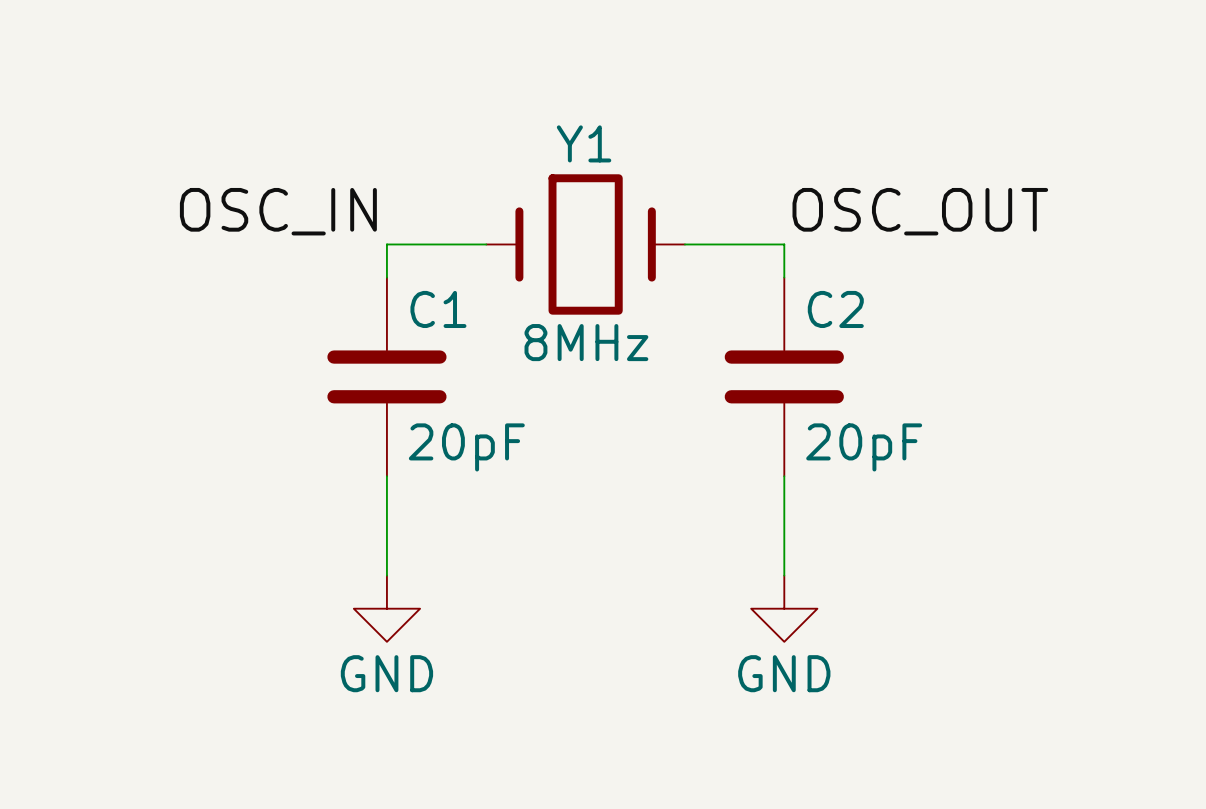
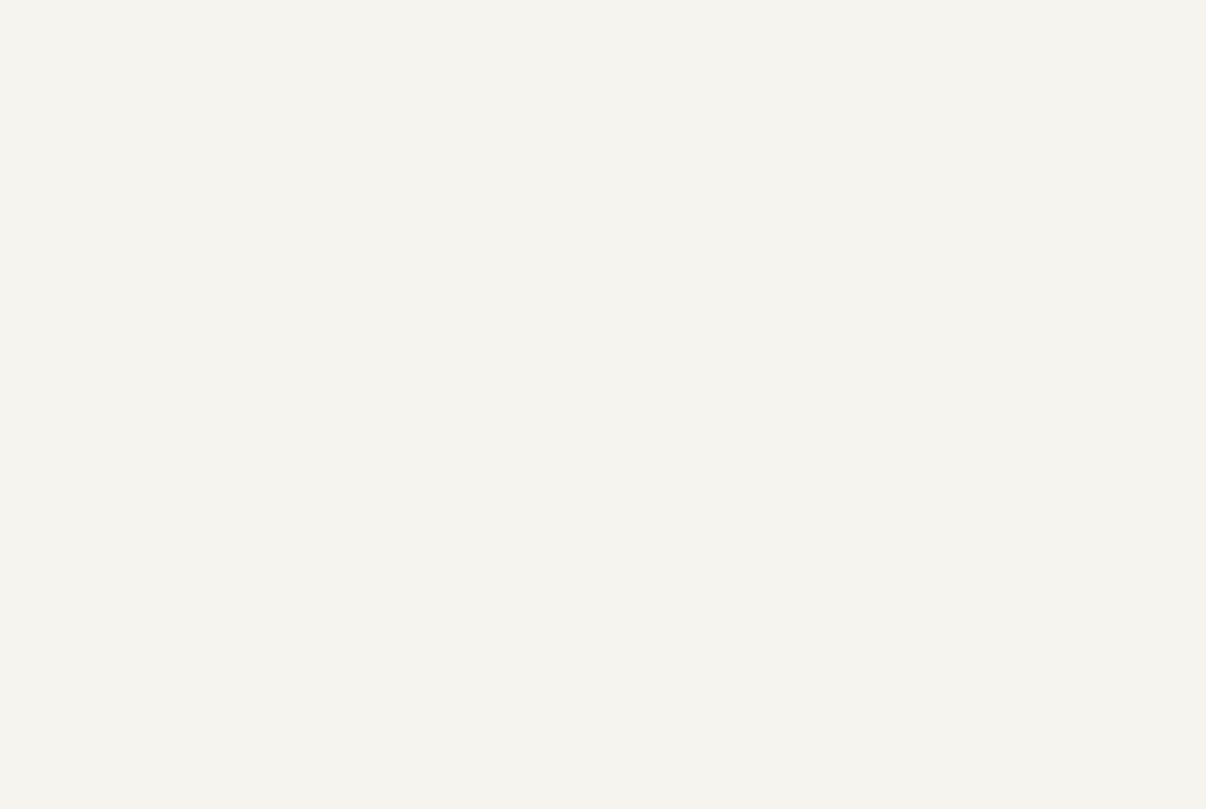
label: OSC_IN (278, 211) -> none
label: OSC_OUT (920, 211) -> none
wire: (486, 244) (386, 244) (386, 277) -> none
Y1: 8MHz (585, 244) -> none
wire: (684, 244) (784, 244) (784, 277) -> none
C1: 20pF (386, 376) -> none
C2: 20pF (784, 376) -> none
wire: (386, 476) (386, 575) -> none
wire: (784, 476) (784, 575) -> none
power symbol: GND (386, 608) -> none
power symbol: GND (784, 608) -> none

